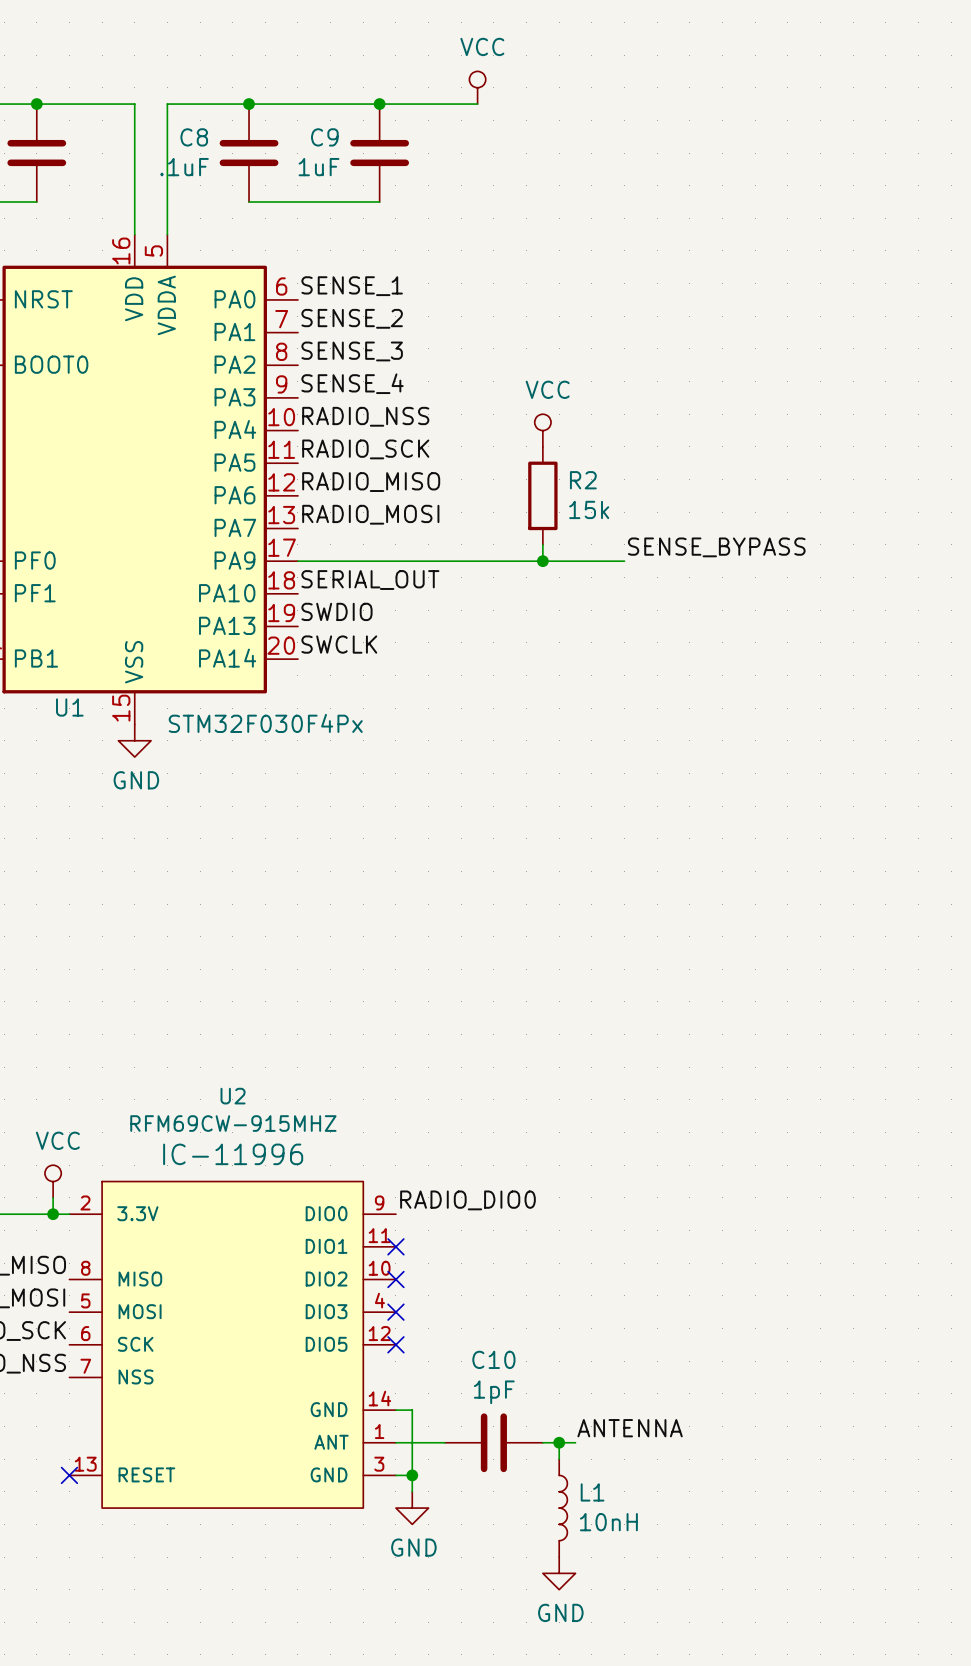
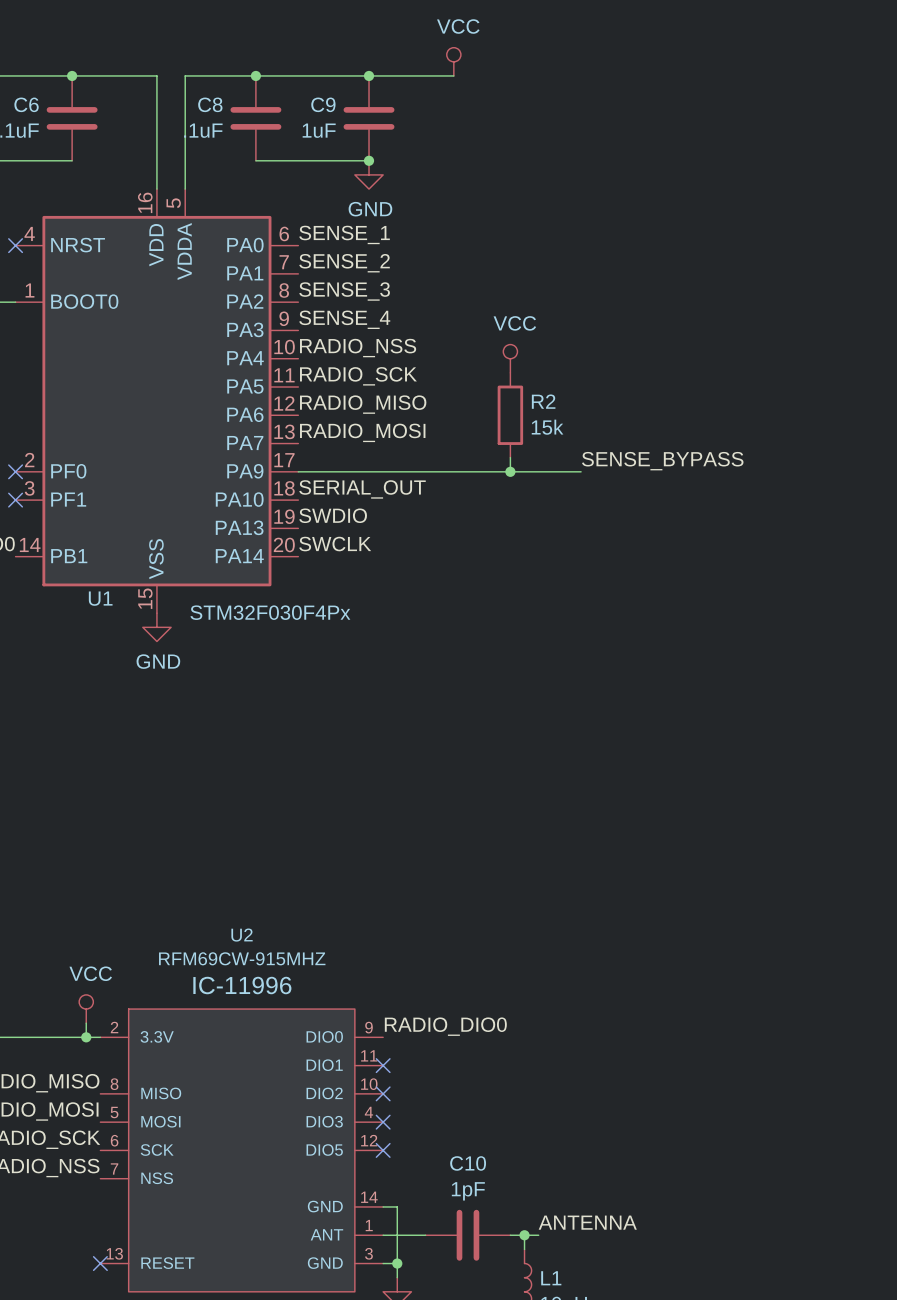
junction: none -> (369, 160)
power symbol: none -> GND (369, 174)

